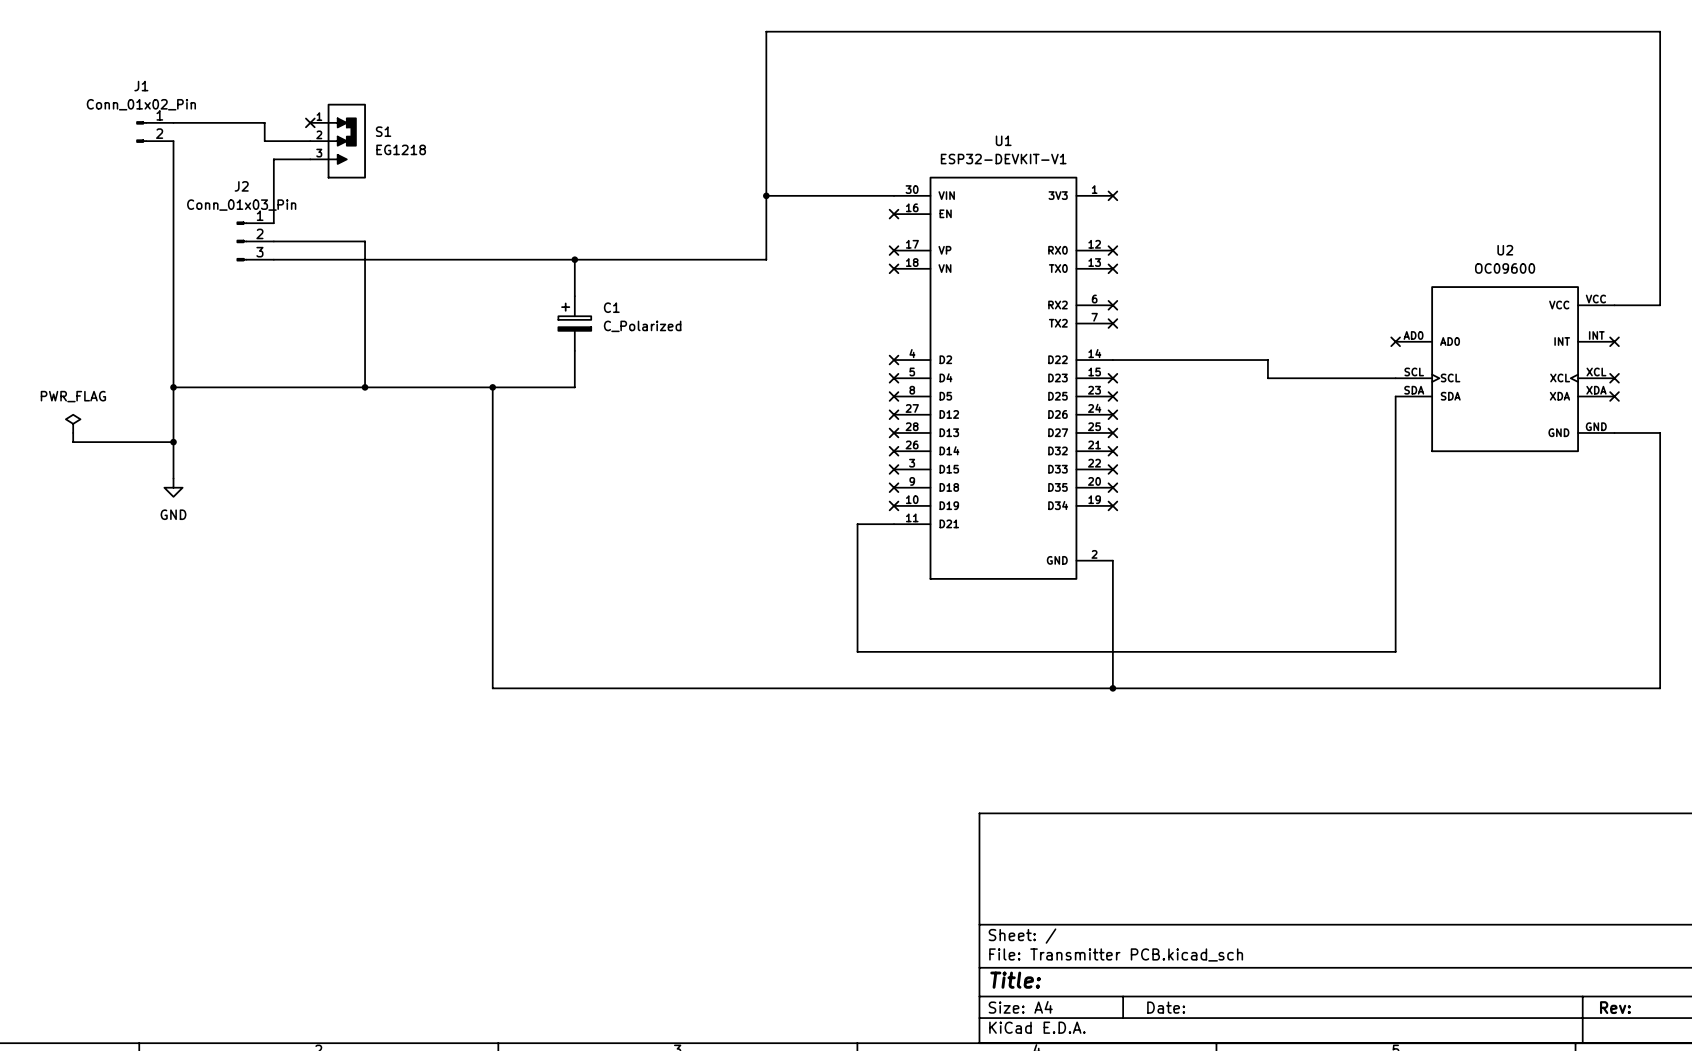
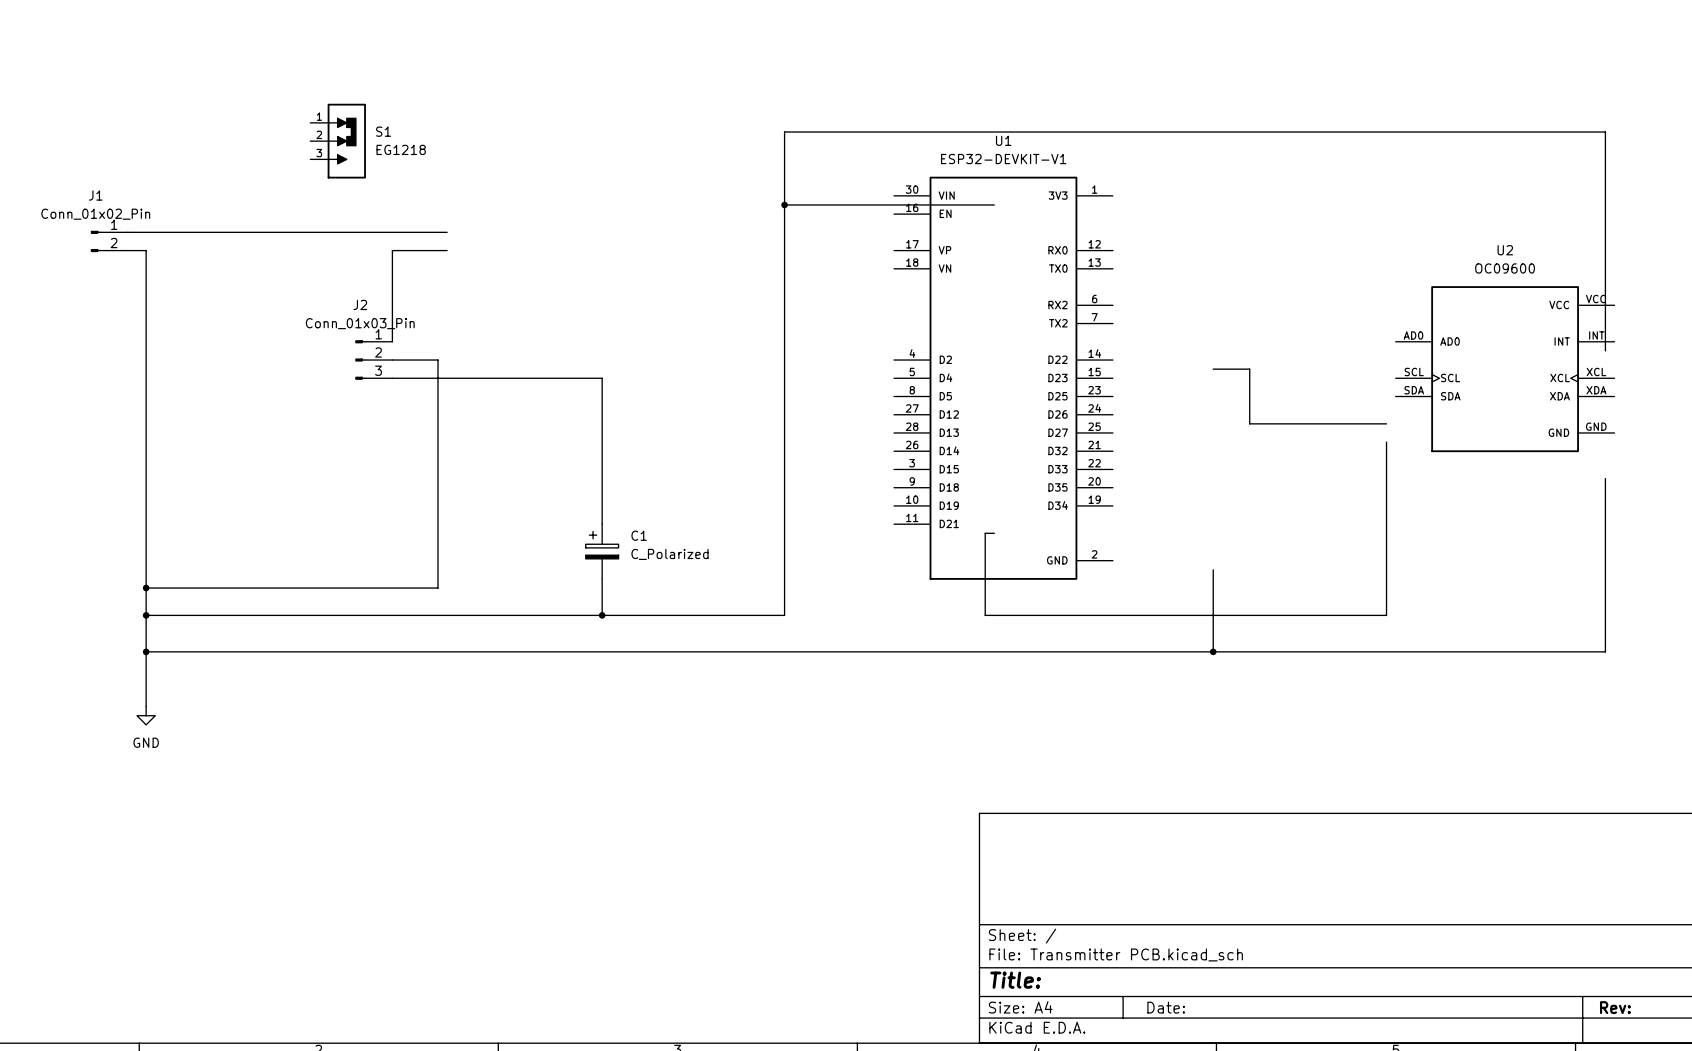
wire: (173, 122) (264, 122) (264, 141) (310, 141) -> none
no-connect mark: (310, 122) -> none
J1 position: (154, 132) -> (109, 241)
wire: (173, 141) (173, 478) -> none
wire: (310, 159) (273, 159) (273, 223) -> none
wire: (766, 195) (894, 195) -> none
junction position: (766, 195) -> (784, 204)
no-connect mark: (1112, 195) -> none
wire: none -> (784, 204) (994, 204)
no-connect mark: (894, 214) -> none
wire: none -> (127, 232) (447, 232)
J2 position: (255, 241) -> (373, 360)
wire: (273, 241) (365, 241) (365, 387) -> none
wire: none -> (127, 250) (146, 250) (146, 706)
wire: none -> (447, 250) (392, 250) (392, 341)
no-connect mark: (894, 250) -> none
no-connect mark: (1112, 250) -> none
wire: (273, 259) (766, 259) (766, 31) (1660, 31) (1660, 305) (1614, 305) -> none
wire: (574, 259) (574, 296) -> none
junction: (574, 259) -> none
no-connect mark: (894, 268) -> none
no-connect mark: (1112, 268) -> none
no-connect mark: (1112, 305) -> none
C1 position: (574, 323) -> (602, 551)
no-connect mark: (1112, 323) -> none
no-connect mark: (1395, 341) -> none
no-connect mark: (1614, 341) -> none
wire: (574, 350) (574, 387) (173, 387) -> none
wire: none -> (1605, 350) (1605, 132) (784, 132) (784, 615) (146, 615)
wire: none -> (392, 360) (438, 360) (438, 588) (146, 588)
no-connect mark: (894, 360) -> none
wire: (1112, 360) (1267, 360) (1267, 378) (1395, 378) -> none
wire: none -> (1213, 369) (1249, 369) (1249, 423) (1386, 423)
wire: none -> (392, 378) (602, 378) (602, 524)
no-connect mark: (894, 378) -> none
no-connect mark: (1112, 378) -> none
no-connect mark: (1614, 378) -> none
junction: (173, 387) -> none
junction: (365, 387) -> none
wire: (492, 387) (492, 688) (1660, 688) (1660, 432) (1614, 432) -> none
junction: (492, 387) -> none
no-connect mark: (894, 396) -> none
no-connect mark: (1112, 396) -> none
wire: (1395, 396) (1395, 651) -> (1605, 478) (1605, 651) (1395, 651)
no-connect mark: (1614, 396) -> none
no-connect mark: (894, 414) -> none
no-connect mark: (1112, 414) -> none
power symbol: PWR_FLAG (73, 423) -> none
wire: (73, 432) (73, 442) (173, 442) -> none
no-connect mark: (894, 432) -> none
no-connect mark: (1112, 432) -> none
junction: (173, 442) -> none
wire: none -> (1386, 442) (1386, 615) (985, 615) (985, 533) (994, 533)
no-connect mark: (894, 451) -> none
no-connect mark: (1112, 451) -> none
no-connect mark: (894, 469) -> none
no-connect mark: (1112, 469) -> none
power symbol: GND (173, 487) -> none
no-connect mark: (894, 487) -> none
no-connect mark: (1112, 487) -> none
no-connect mark: (894, 505) -> none
no-connect mark: (1112, 505) -> none
wire: (894, 524) (857, 524) (857, 651) -> (146, 651) (857, 651)
wire: (1112, 560) (1112, 688) -> none
wire: none -> (1213, 569) (1213, 651)
wire: none -> (602, 578) (602, 615)
junction: none -> (146, 588)
junction: none -> (146, 615)
junction: none -> (602, 615)
junction: none -> (146, 651)
junction: none -> (1213, 651)
junction: (1112, 688) -> none
power symbol: none -> GND (146, 715)

